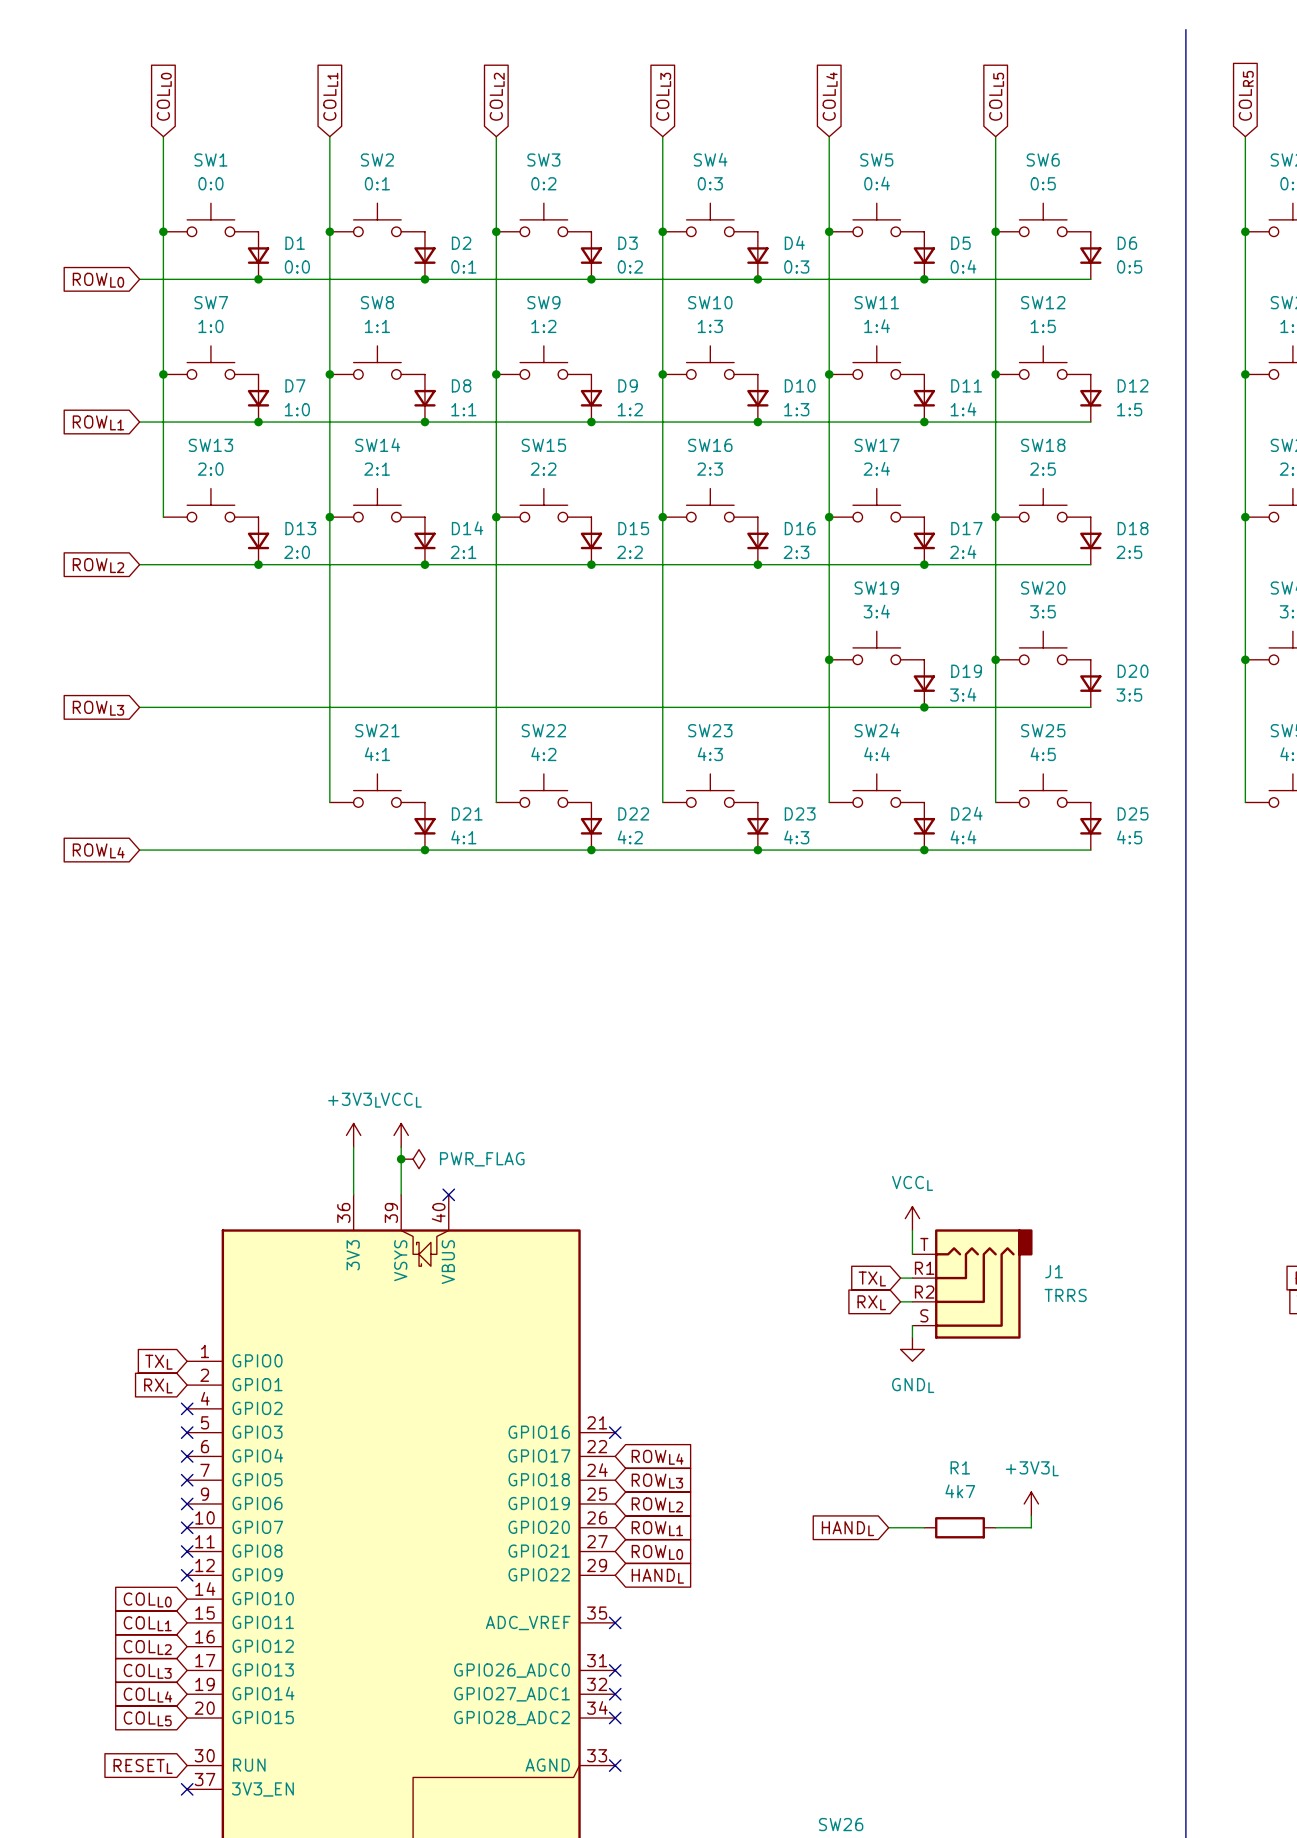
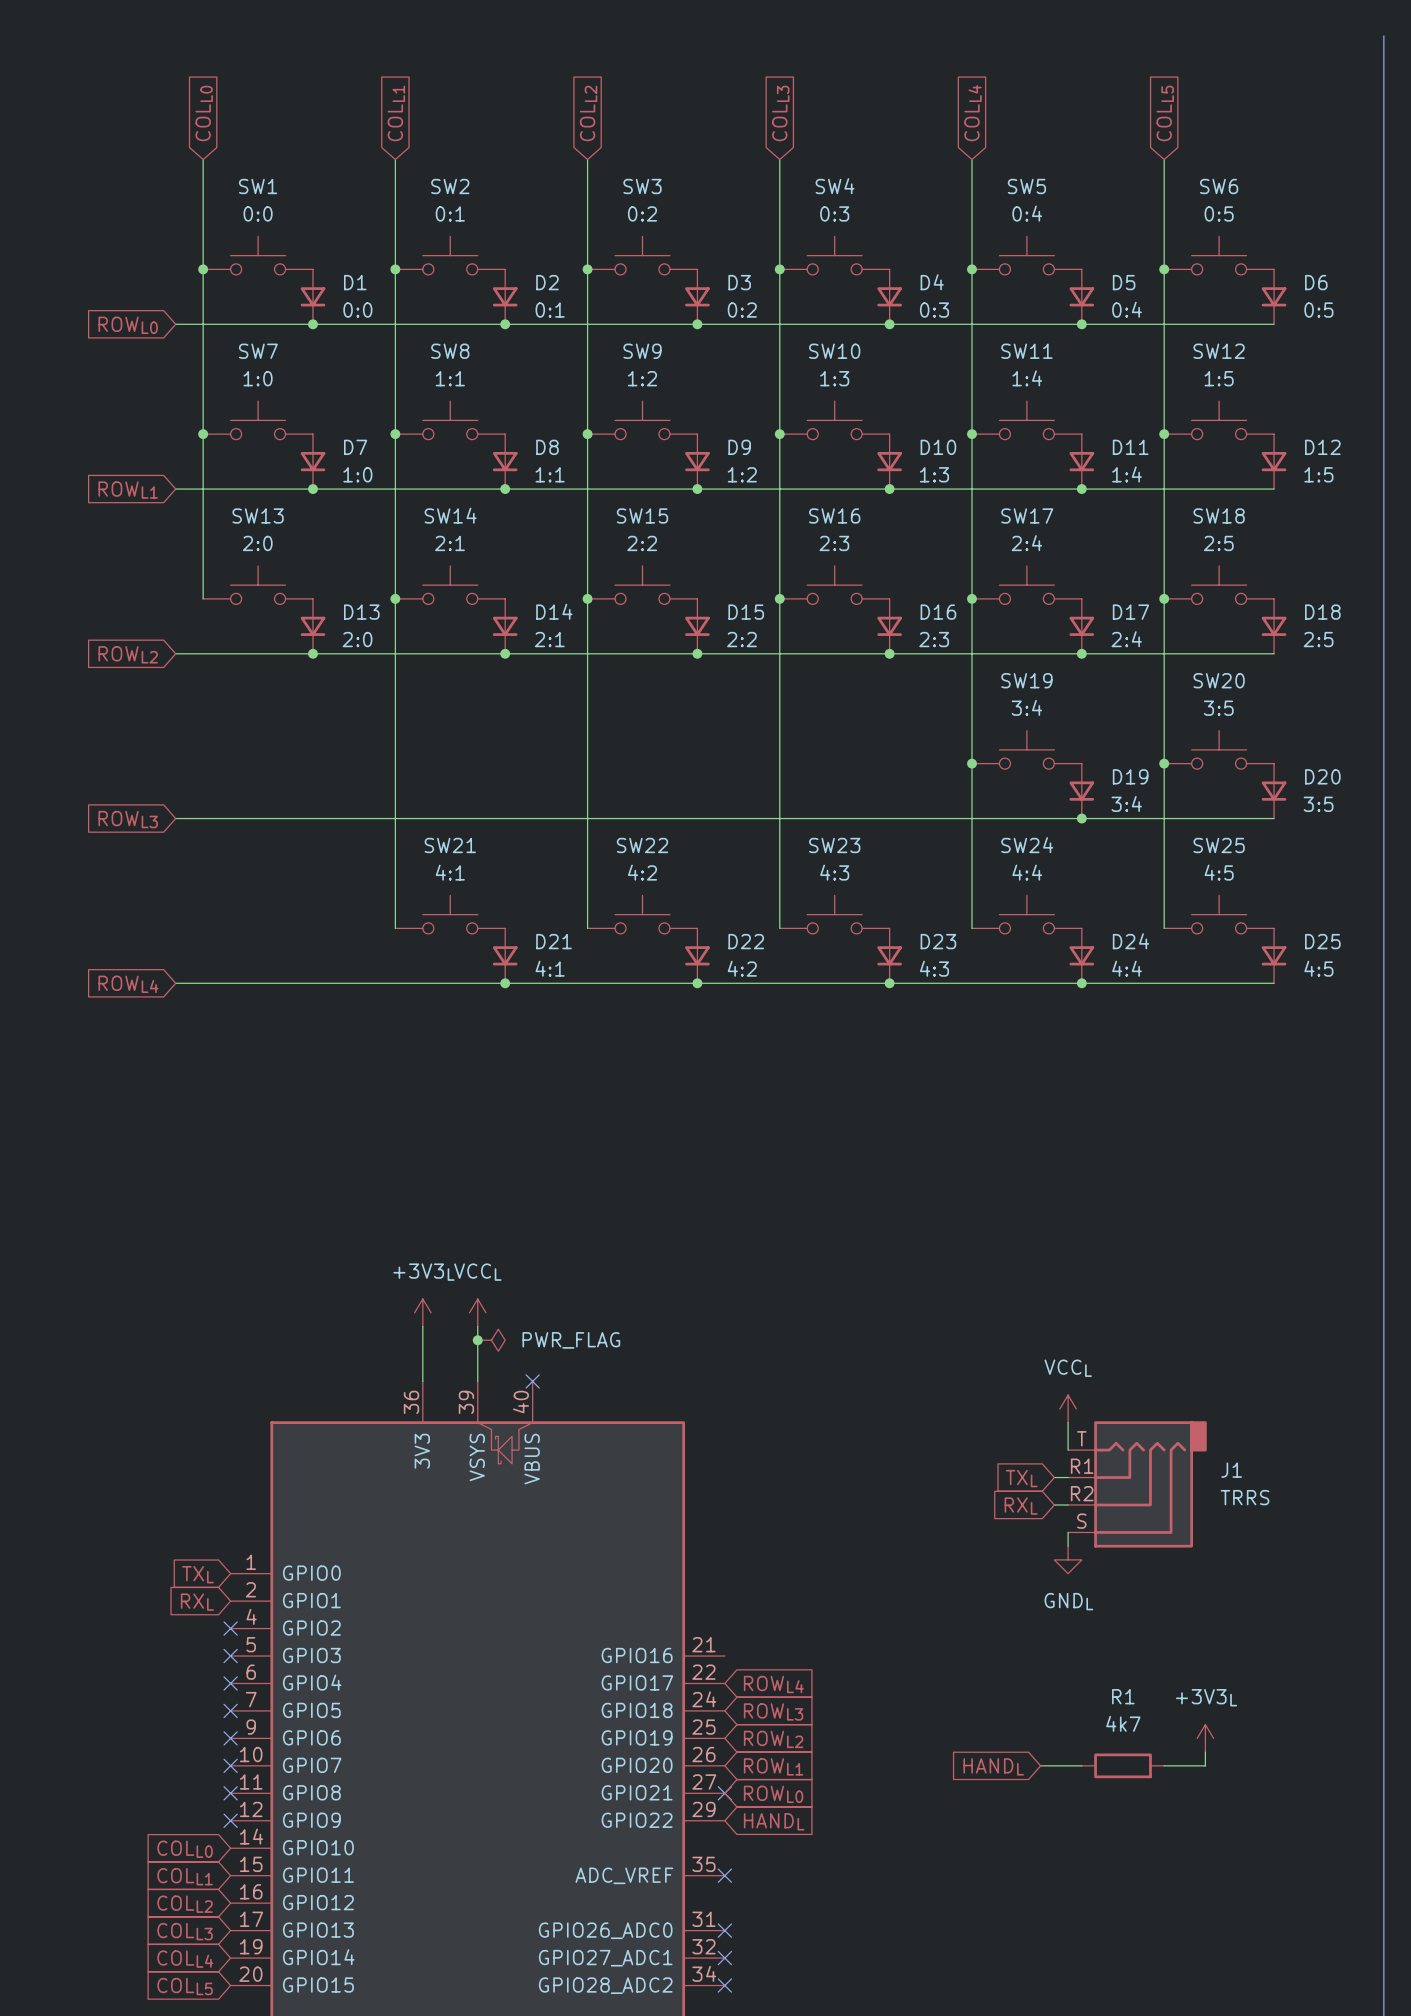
no-connect mark: (615, 1432) -> none
no-connect mark: none -> (724, 1793)

